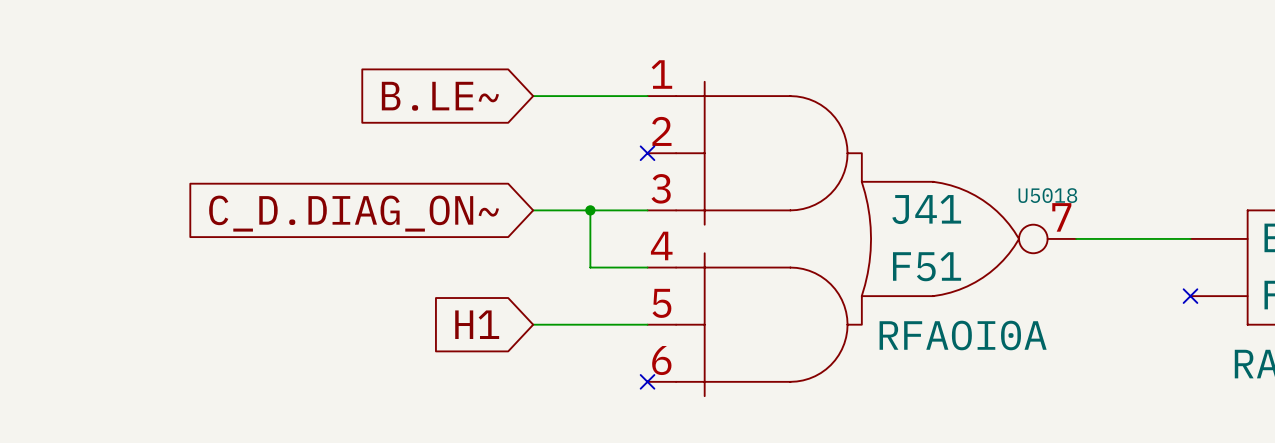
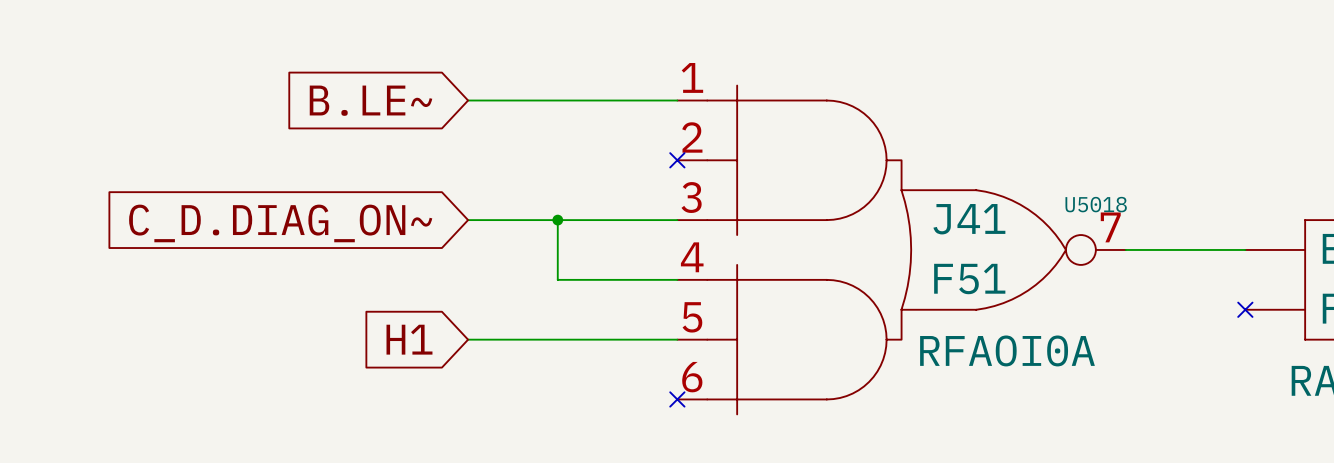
global label position: B.LE~ (440, 96) -> B.LE~ (371, 100)
wire: none -> (468, 100) (557, 100)
wire: (590, 210) (590, 267) -> (468, 220) (557, 220) (557, 279) (617, 279)
junction position: (590, 210) -> (557, 220)
global label position: C_D.DIAG_ON~ (354, 213) -> C_D.DIAG_ON~ (280, 223)
wire: none -> (468, 339) (557, 339)
global label position: H1 (477, 324) -> H1 (409, 339)

